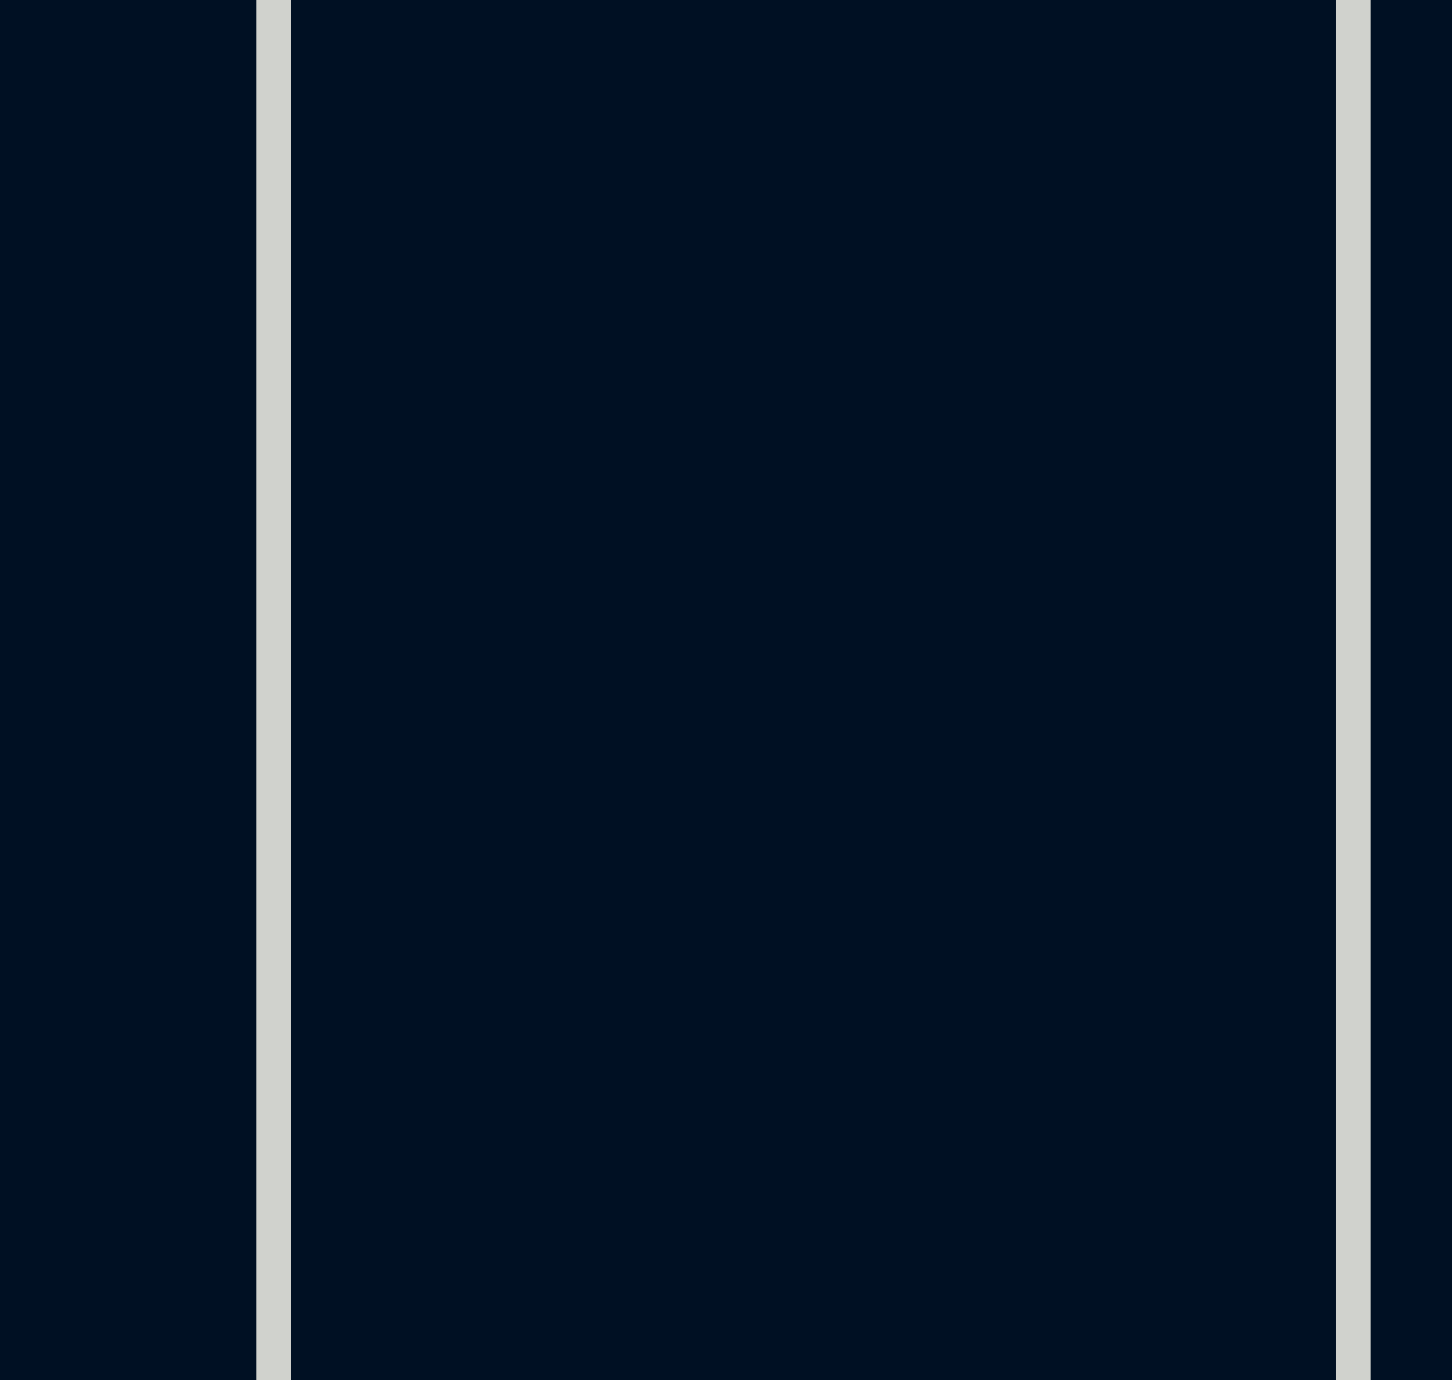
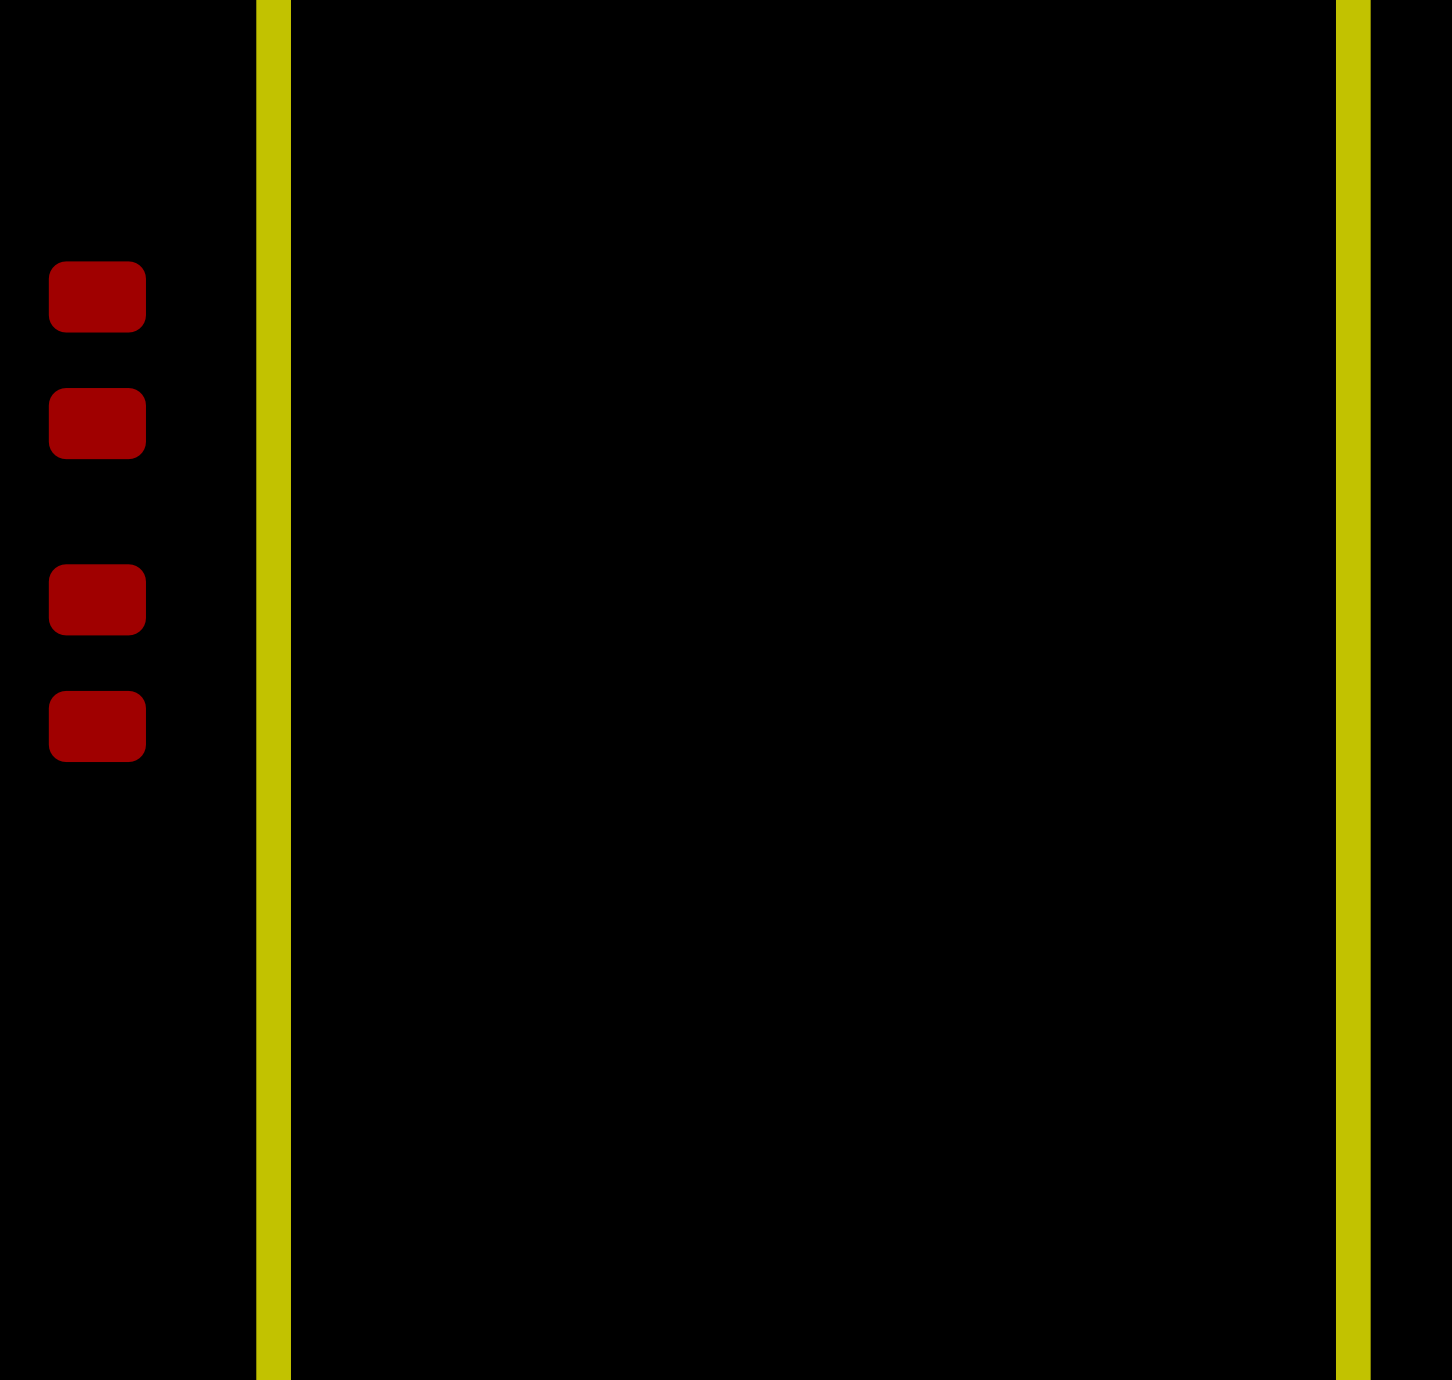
part: none -> (97, 360)
part: none -> (97, 663)

